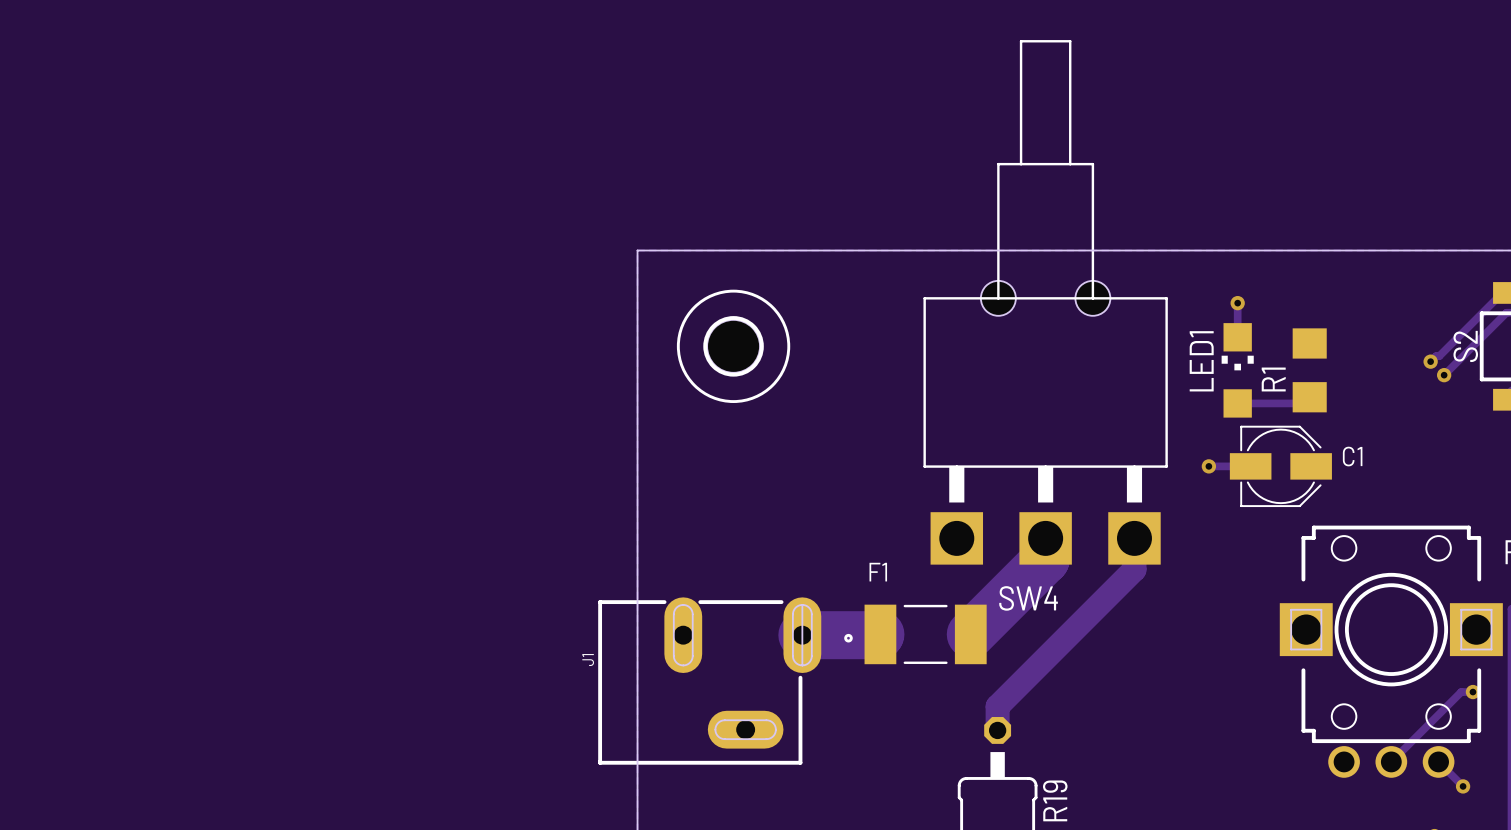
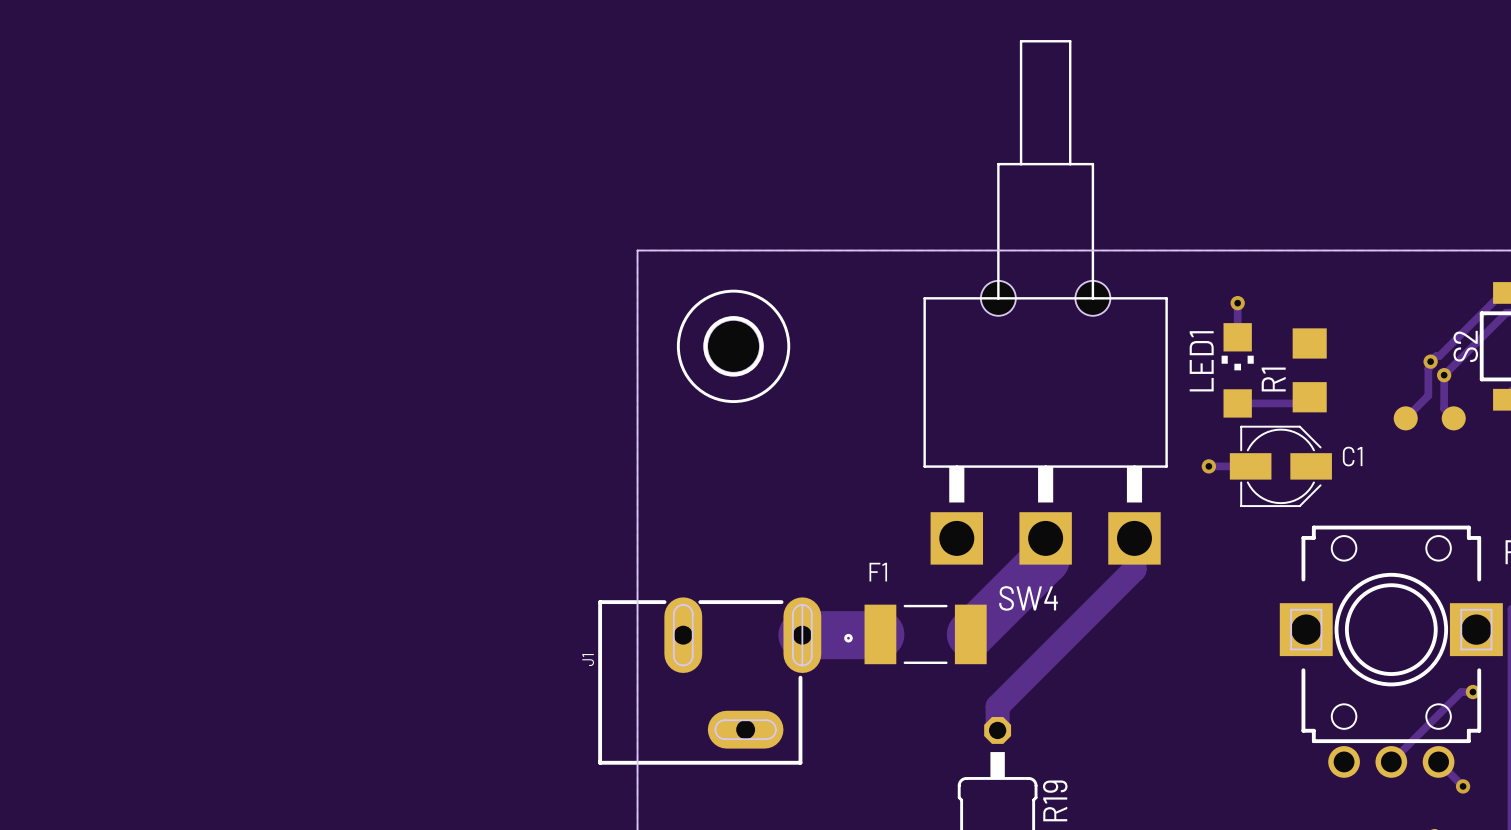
track: none -> (1430, 361) (1428, 368) (1428, 395) (1405, 418)
track: none -> (1444, 375) (1444, 408) (1453, 418)
part: none -> (1405, 418)
part: none -> (1453, 418)

